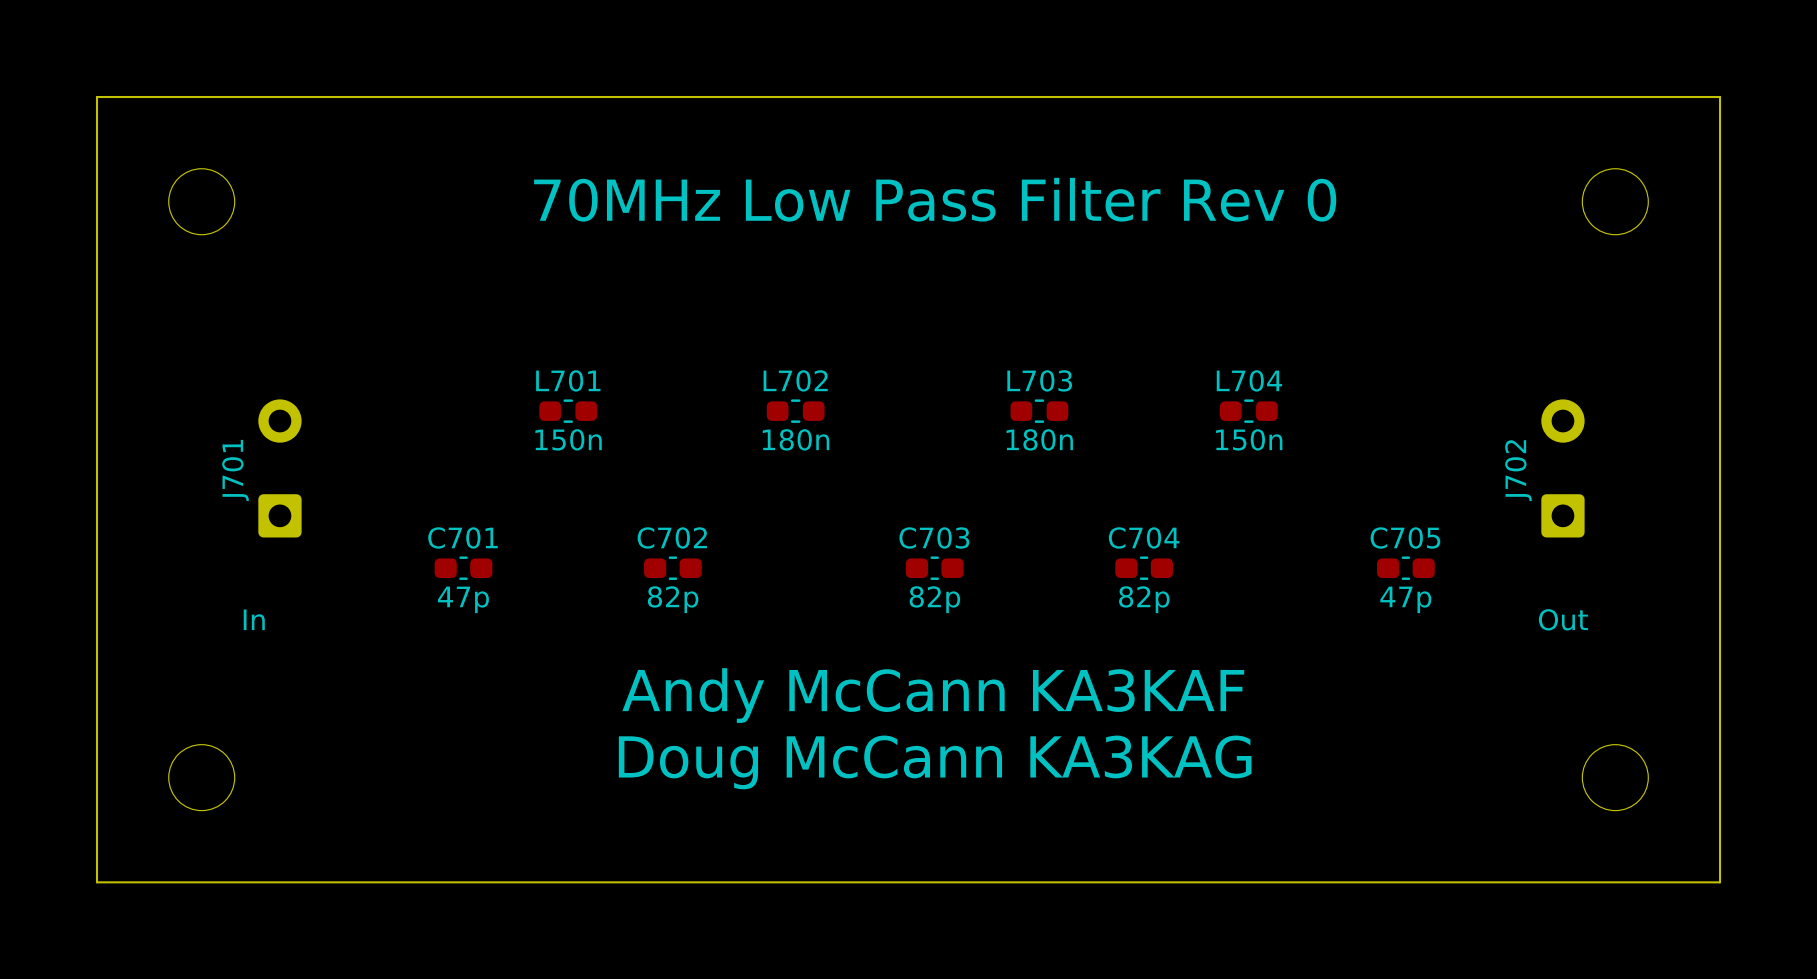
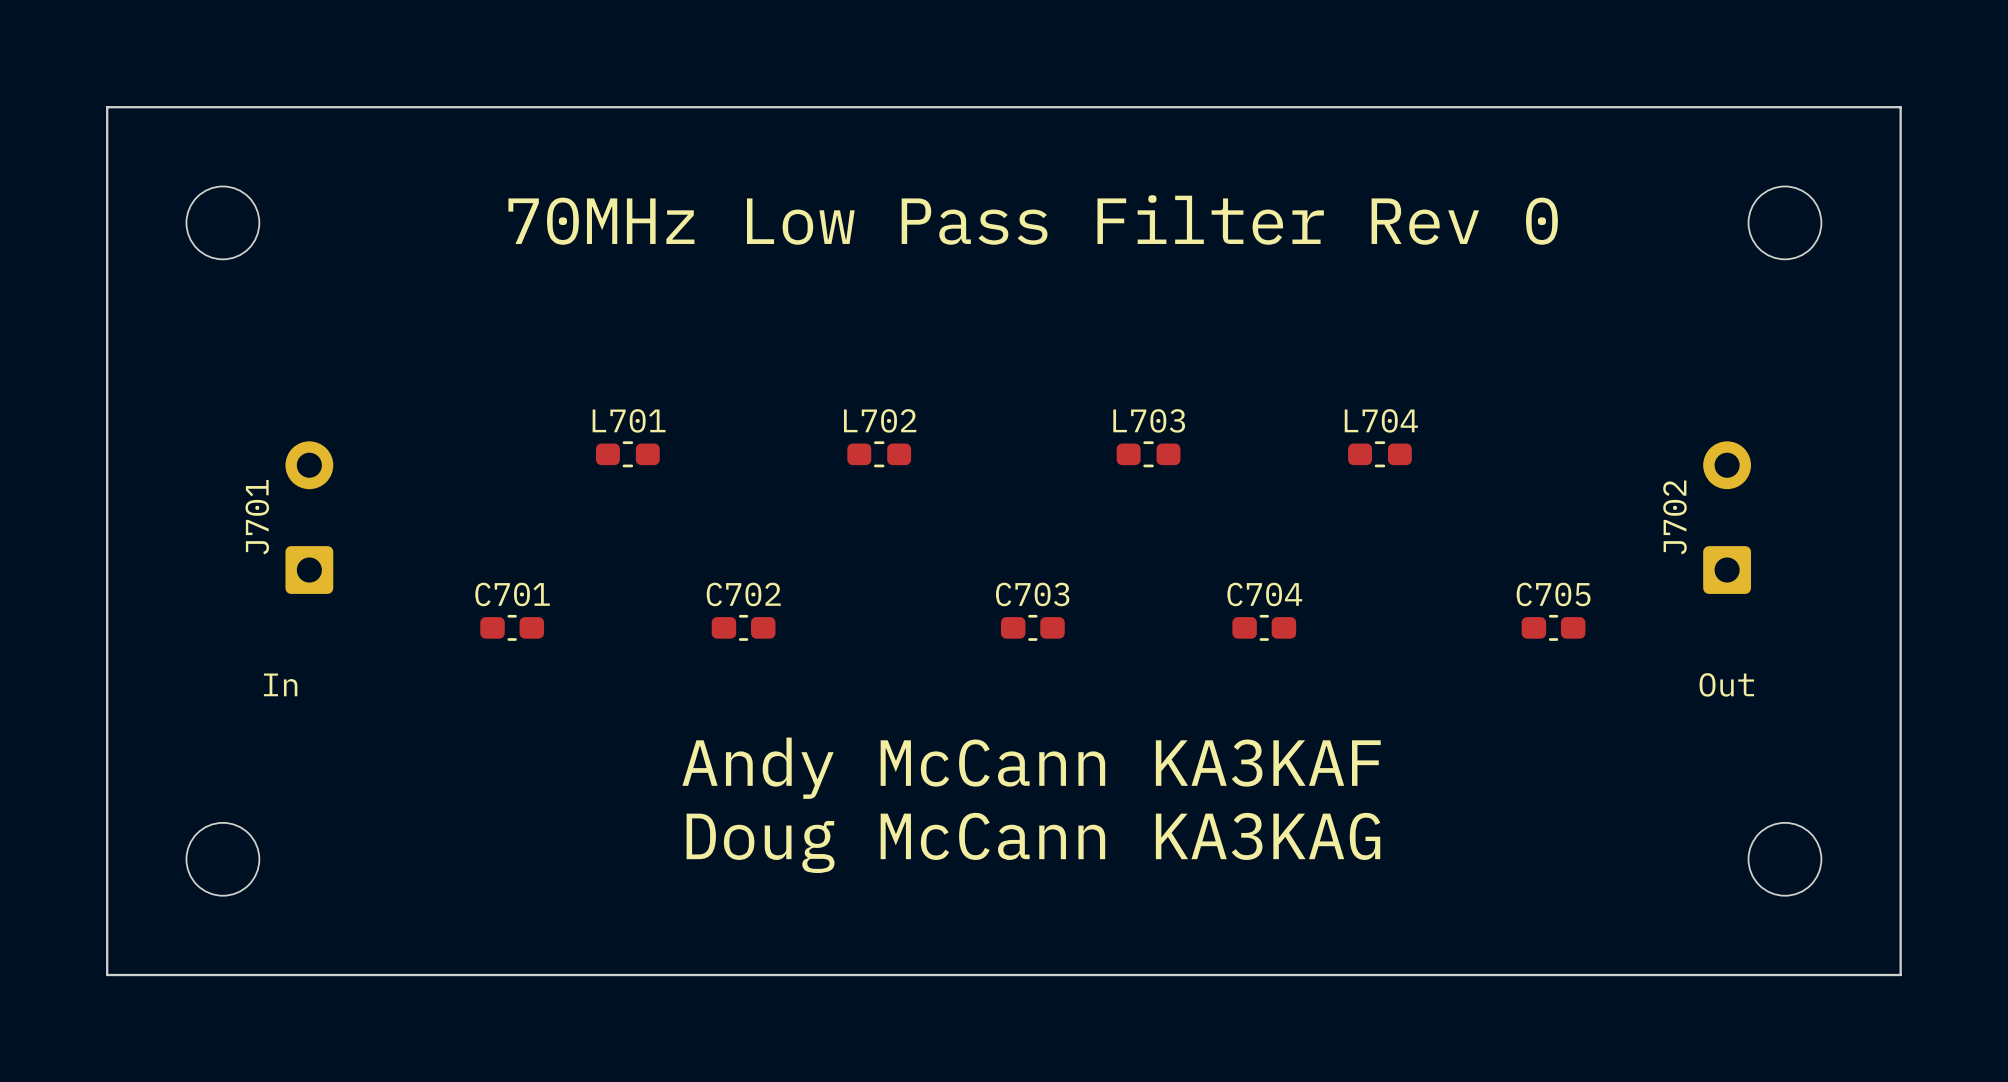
L701 value: 150n (568, 439) -> none
L702 value: 180n (796, 439) -> none
L703 value: 180n (1039, 439) -> none
L704 value: 150n (1249, 439) -> none
C701 value: 47p (463, 599) -> none
C702 value: 82p (673, 599) -> none
C703 value: 82p (934, 599) -> none
C704 value: 82p (1144, 599) -> none
C705 value: 47p (1405, 599) -> none

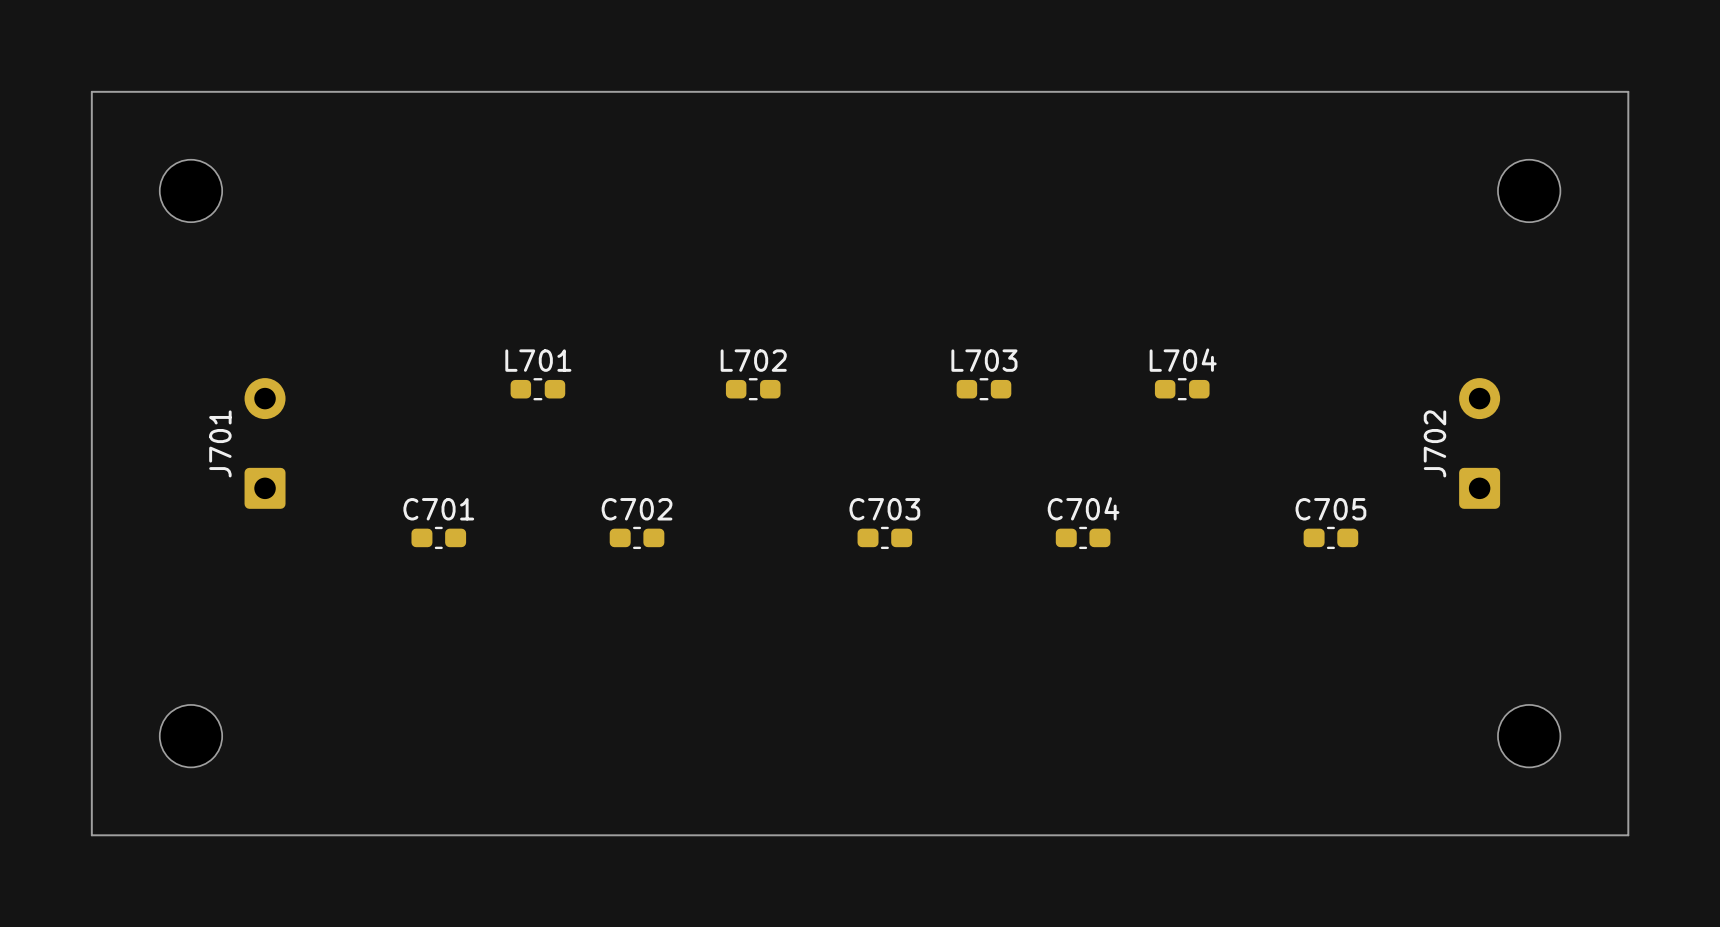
text: 70MHz Low Pass Filter Rev 0 (1033, 219) -> none
text: In (280, 684) -> none
text: Out (1726, 684) -> none
text: Andy McCann KA3KAF (1031, 768) -> none
text: Doug McCann KA3KAG (1033, 842) -> none

